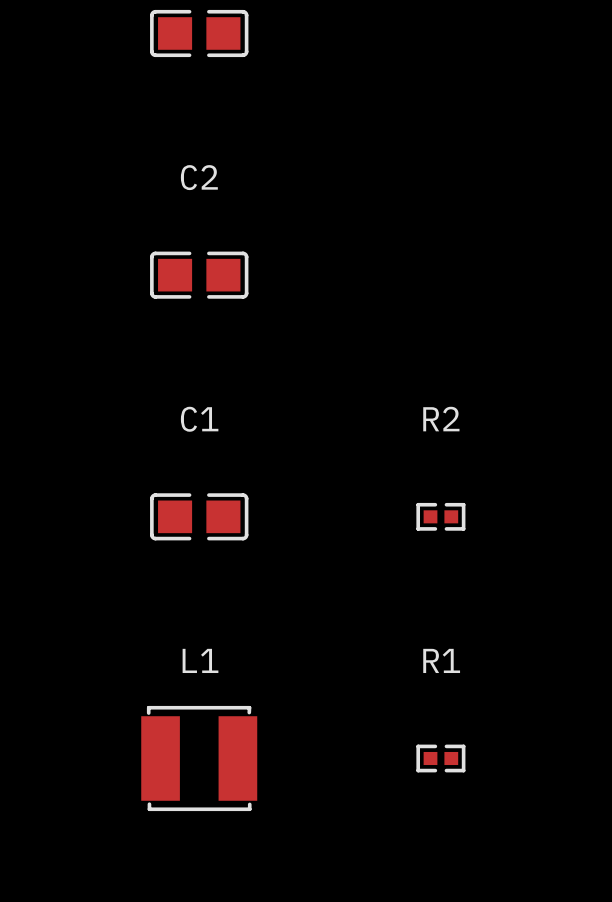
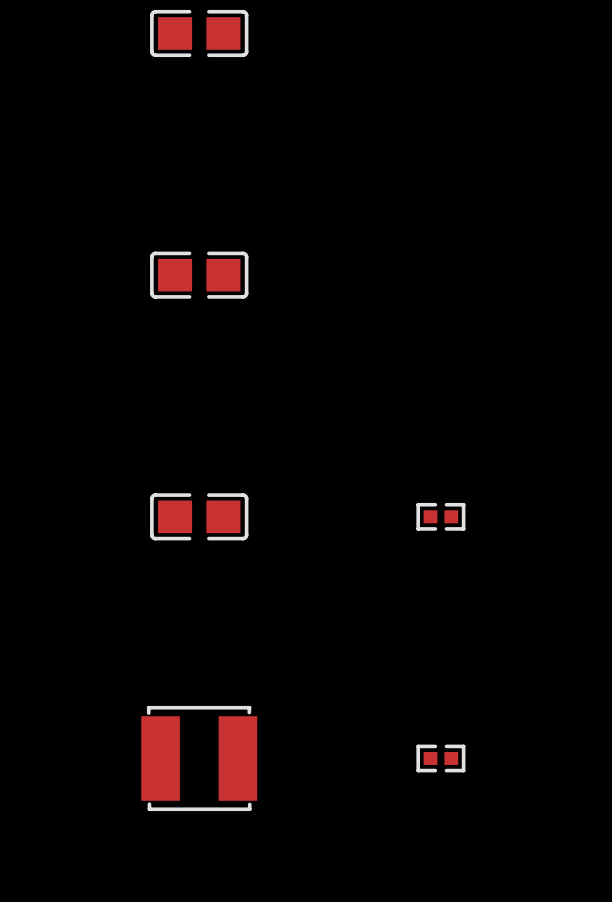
C2 name: C2 (199, 177) -> none
C1 name: C1 (199, 419) -> none
R2 name: R2 (441, 419) -> none
L1 name: L1 (200, 660) -> none
R1 name: R1 (441, 660) -> none

